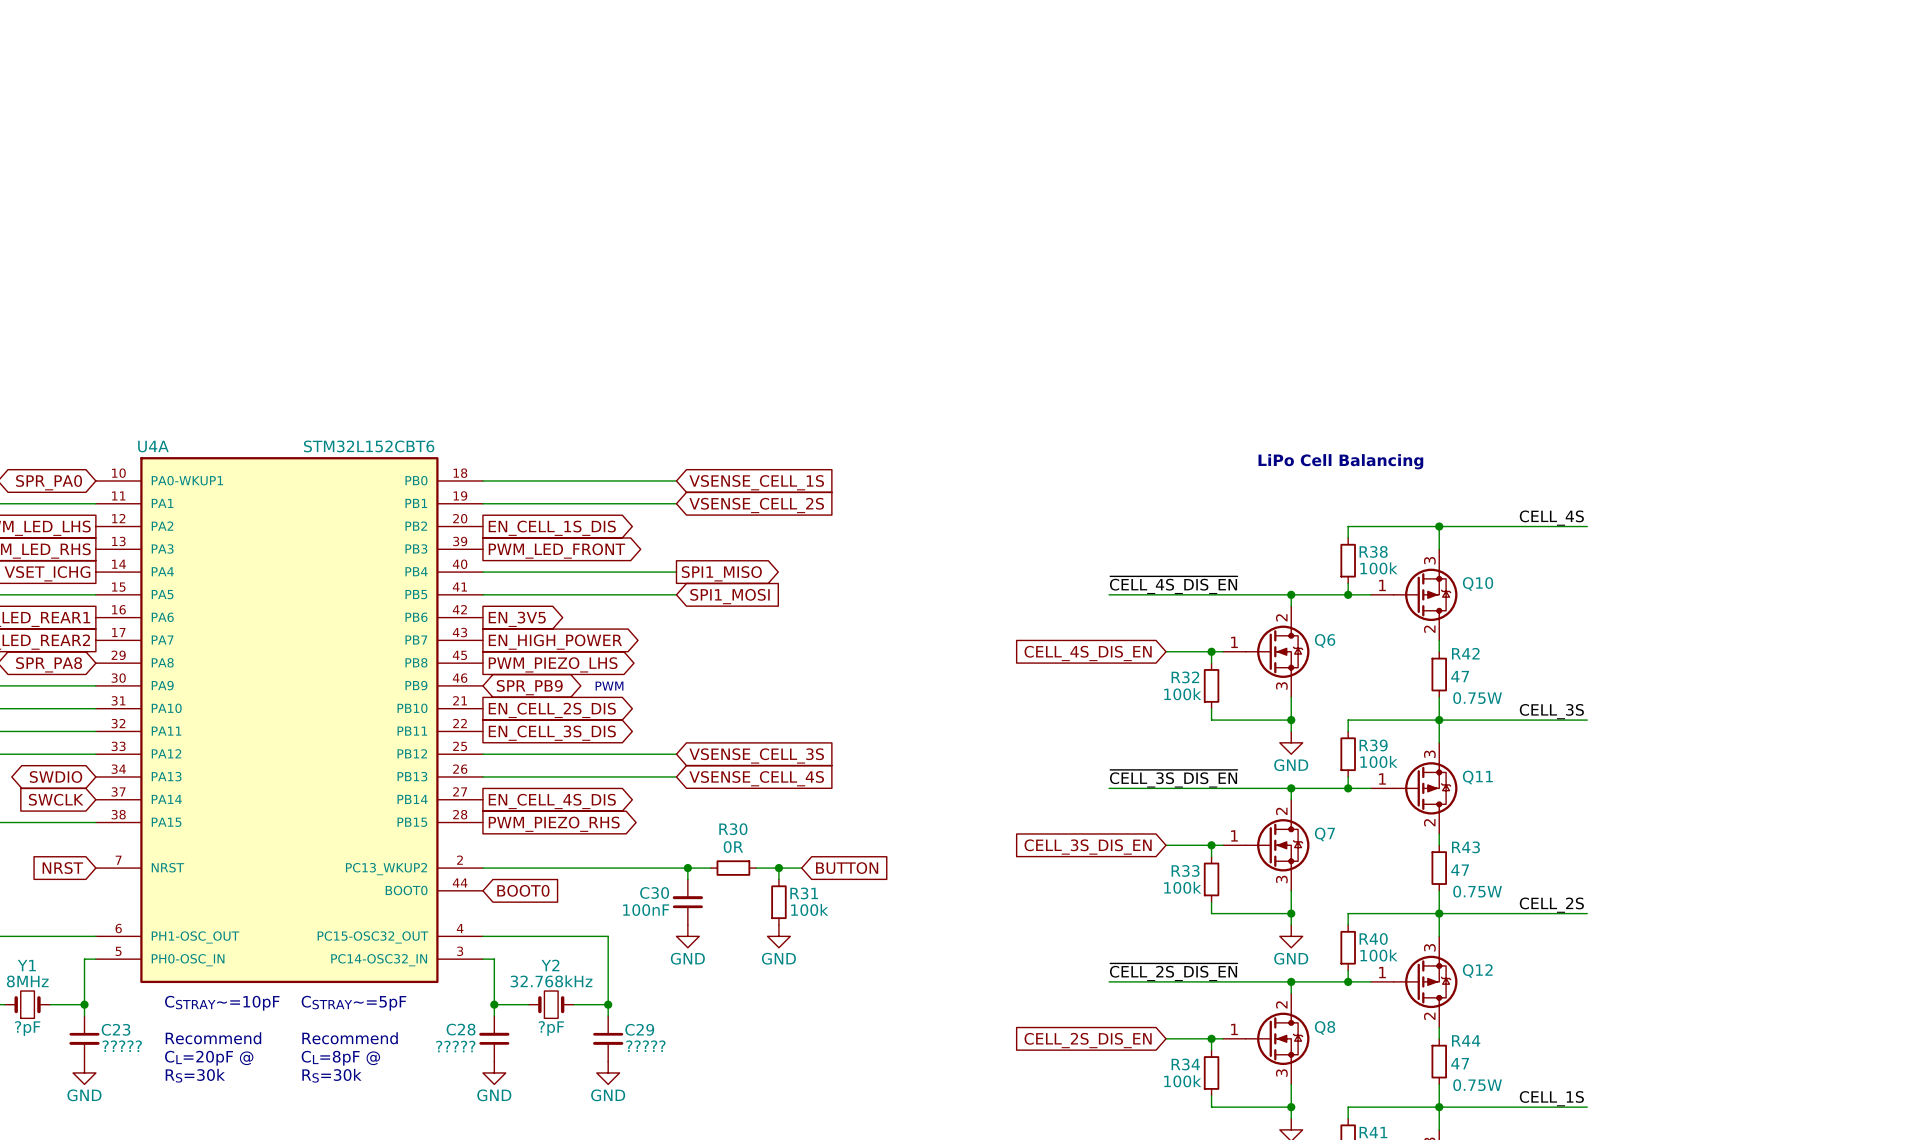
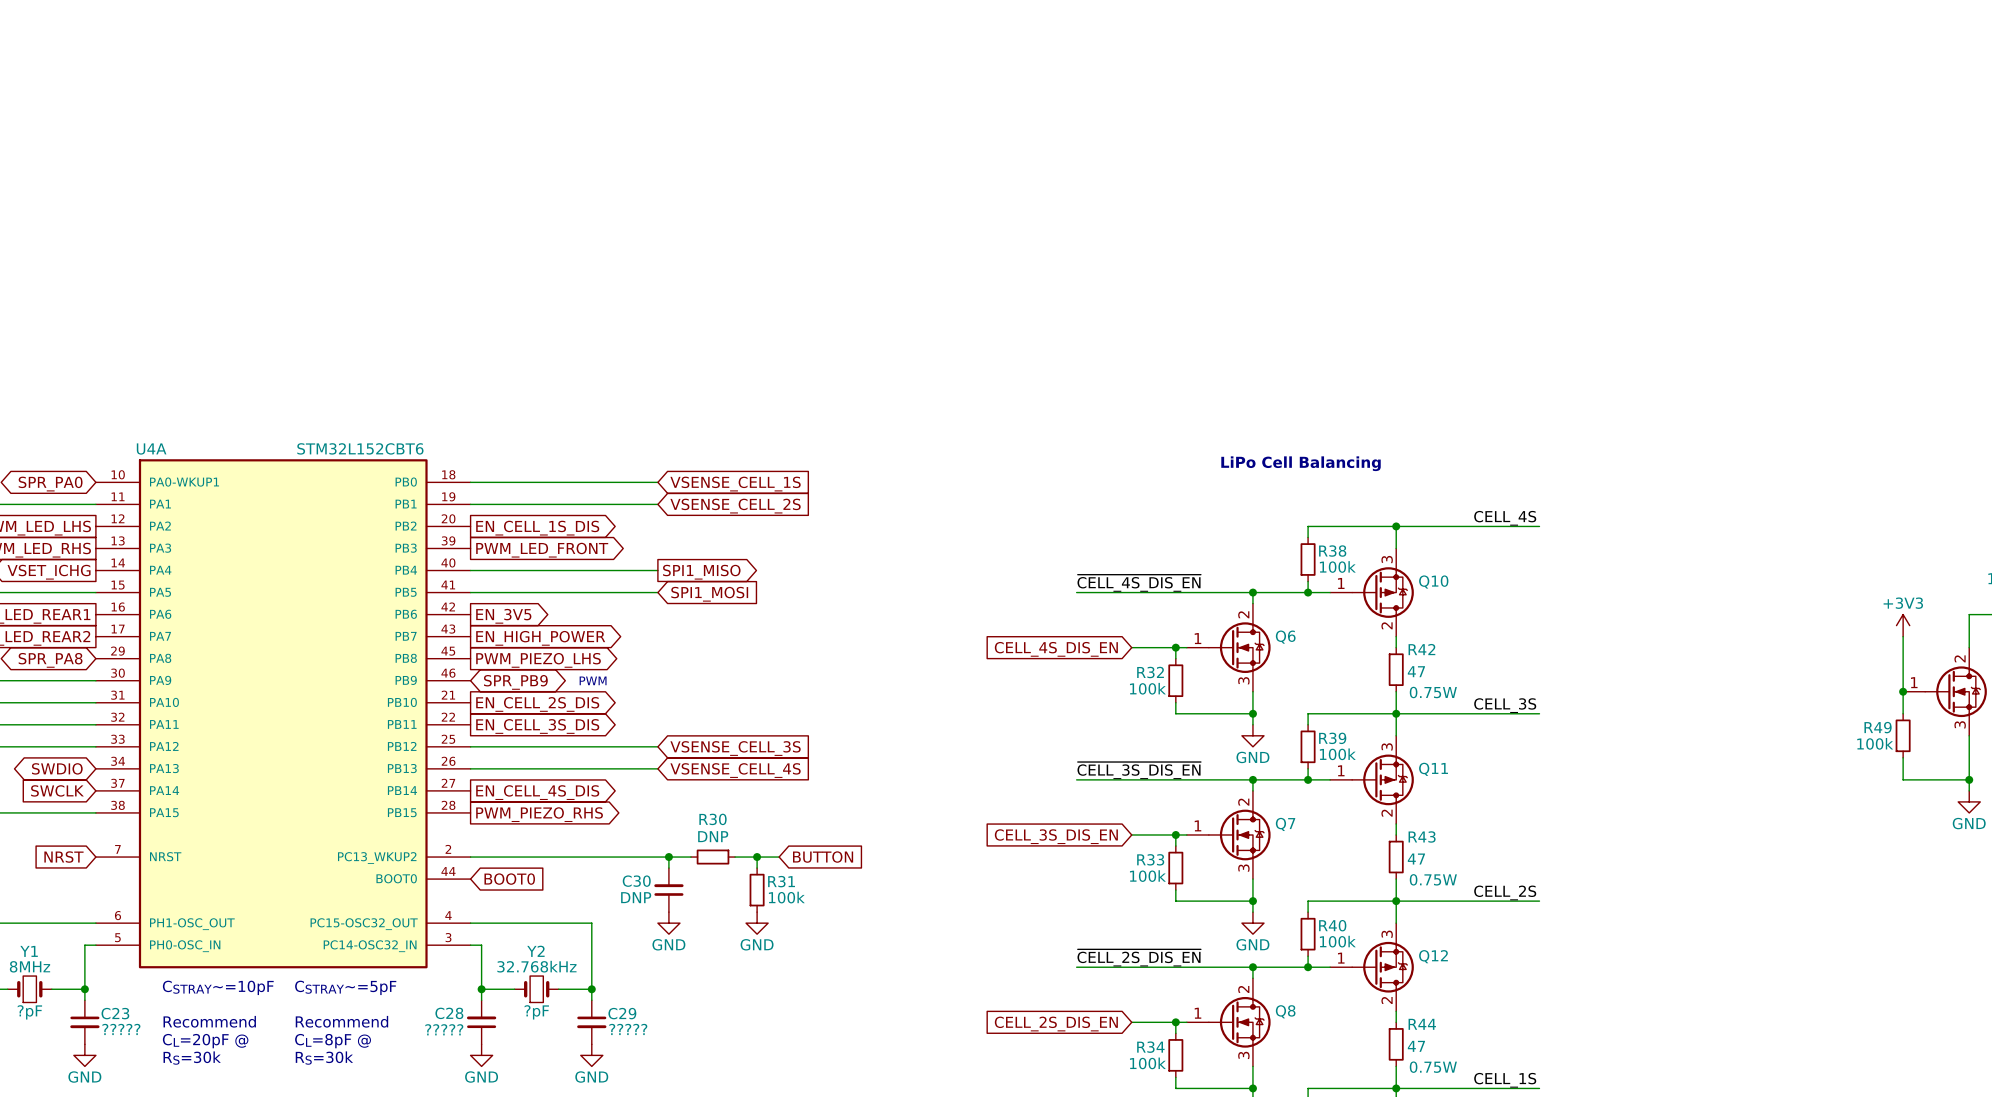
R30 value: 0R (733, 847) -> DNP (713, 836)
C30 value: 100nF (646, 910) -> DNP (636, 897)

